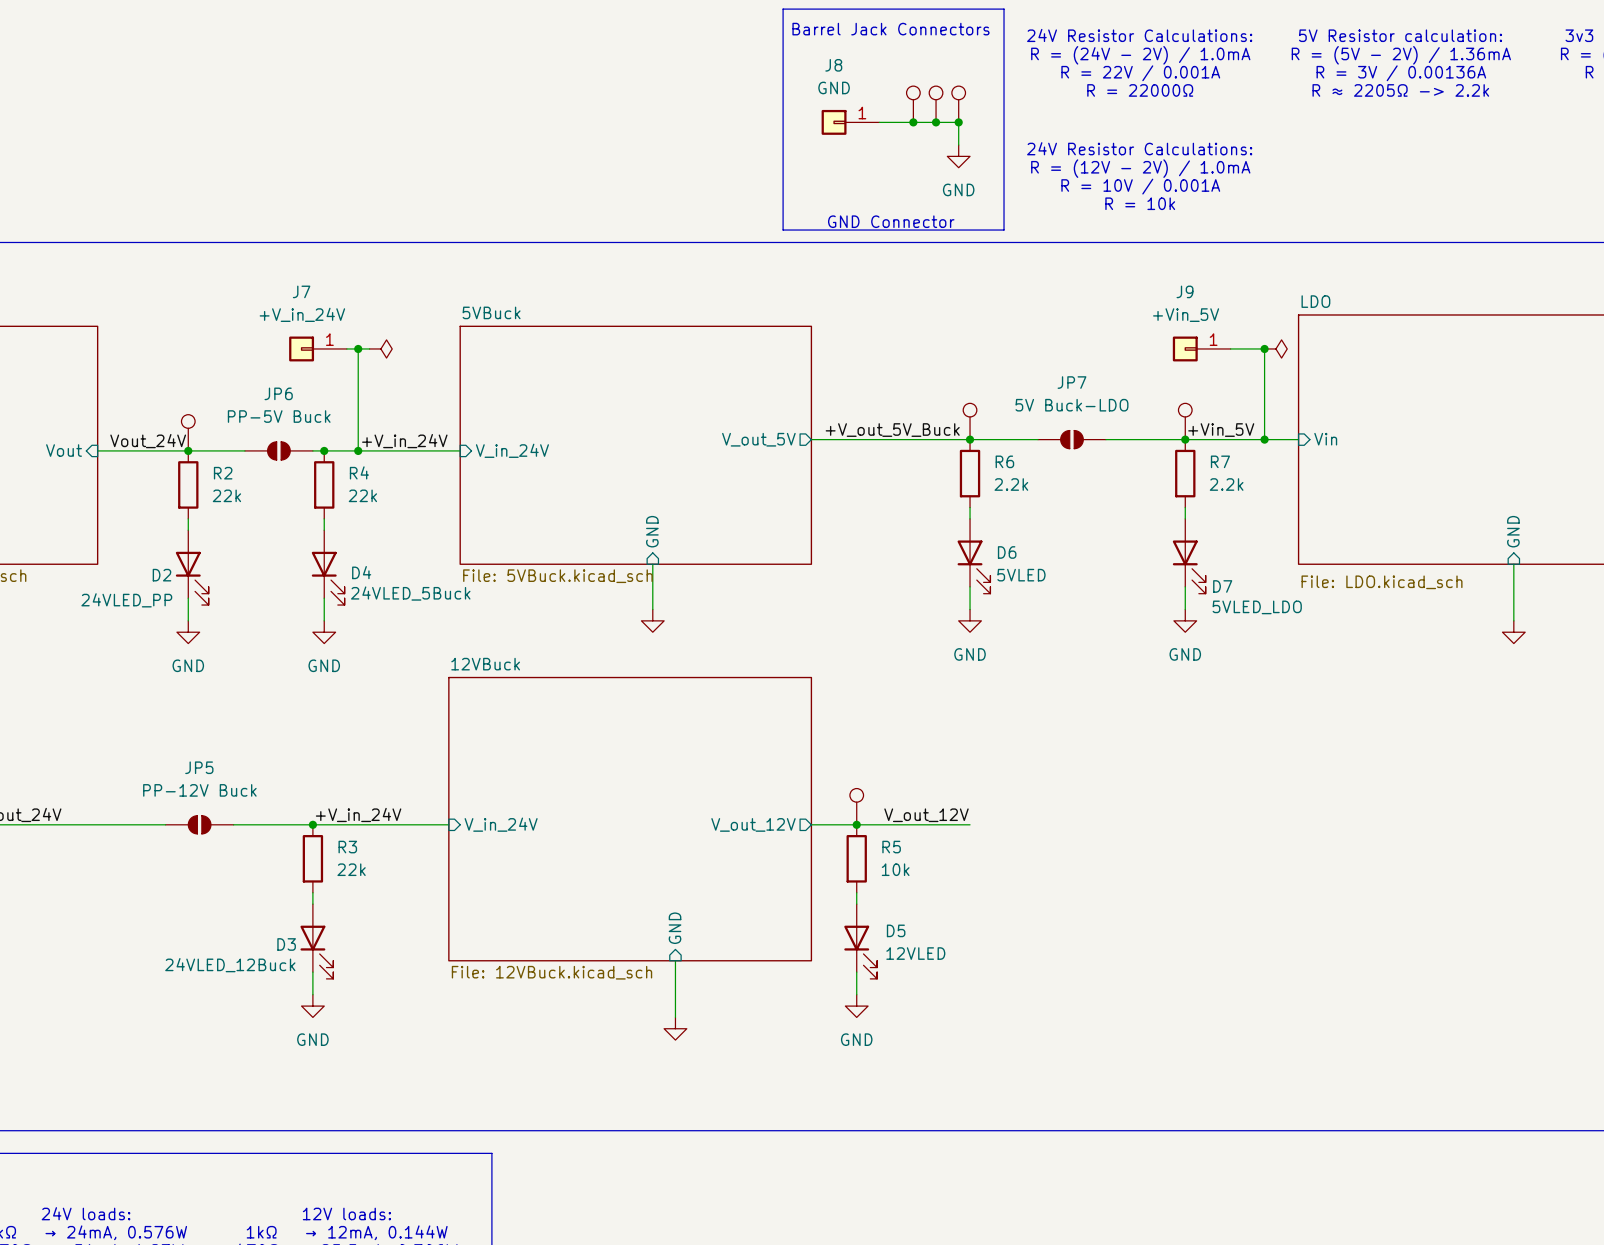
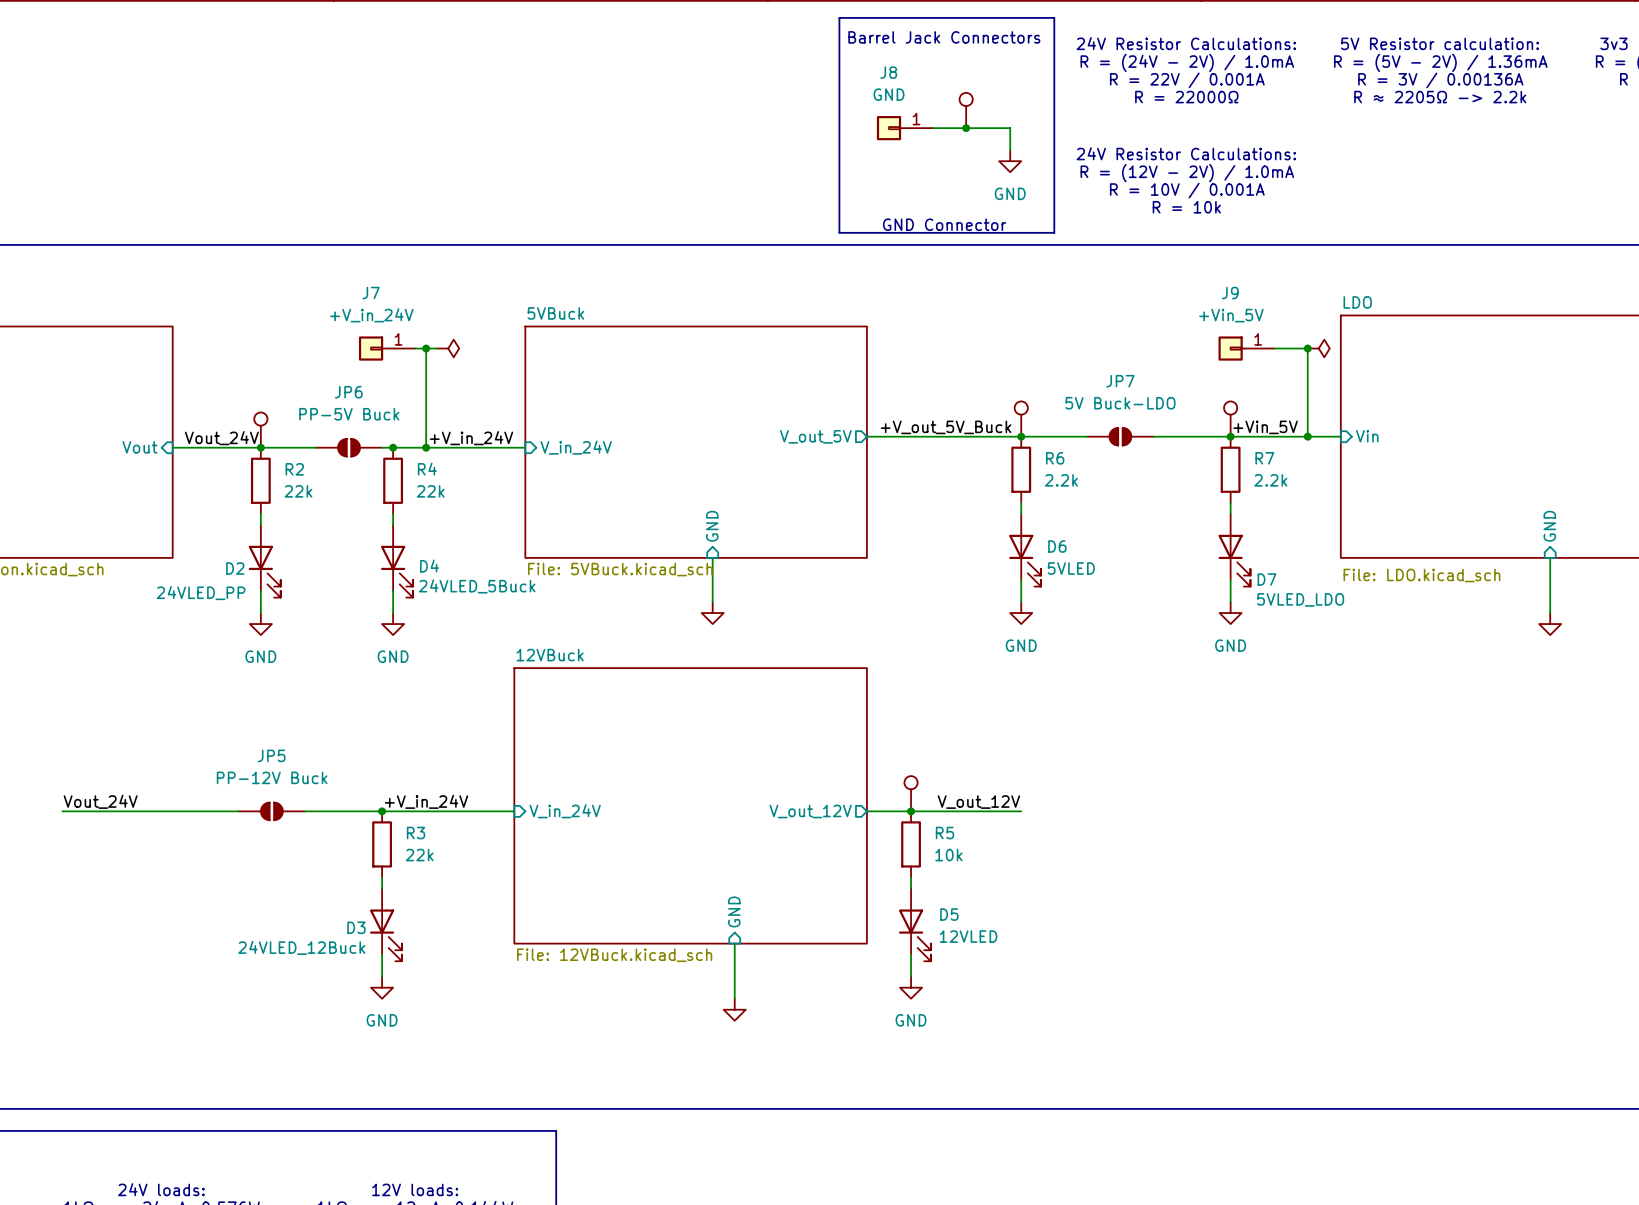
part: (936, 104) -> none
part: (958, 104) -> none
junction: (936, 122) -> none
junction: (958, 122) -> none

